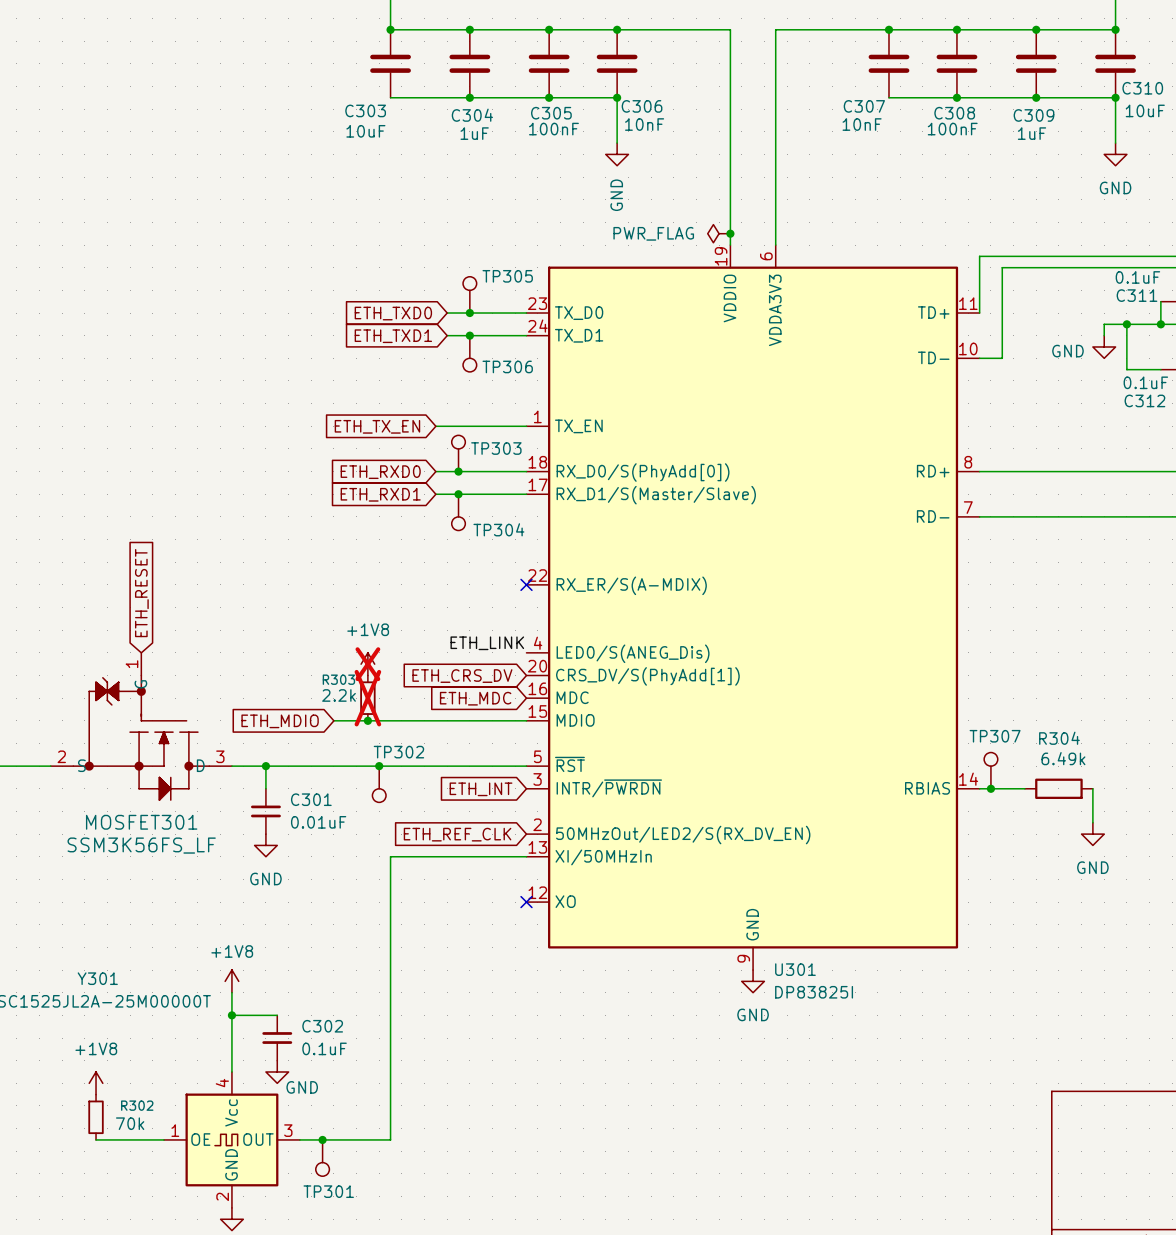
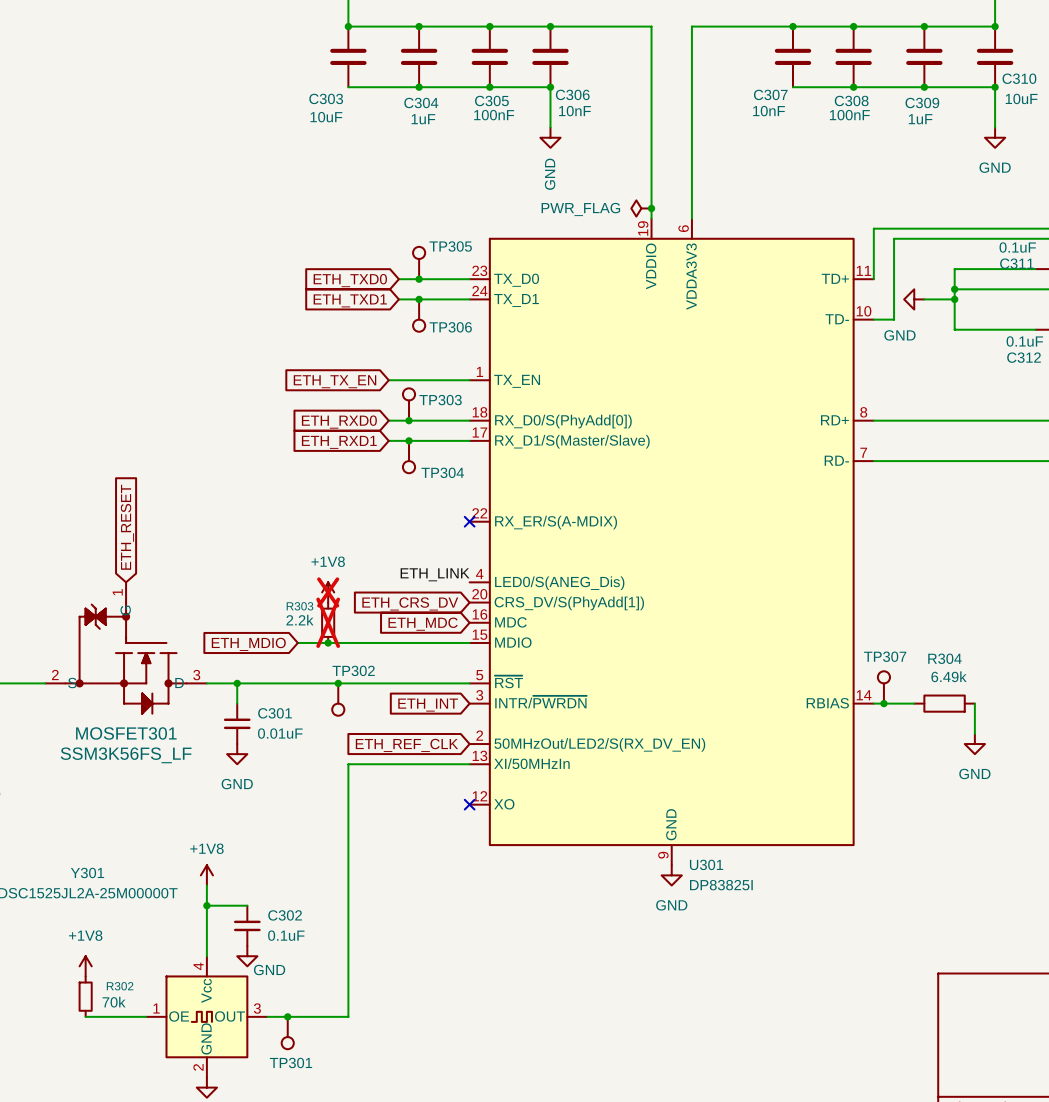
wire: (1160, 301) (1160, 324) -> none
junction: none -> (954, 289)
wire: (1104, 324) (1104, 335) -> (984, 289) (954, 289)
wire: (1126, 324) (1126, 369) -> (1035, 269) (954, 269) (954, 329) (1005, 329)
junction: (1126, 324) -> none
junction: (1160, 324) -> none
wire: none -> (924, 299) (954, 299)
junction: none -> (954, 299)
power symbol rotation: 0° (1104, 346) -> 90° clockwise (914, 299)
power symbol position: GND (1104, 346) -> GND (914, 299)
power symbol text position: GND (1067, 351) -> GND (899, 335)

